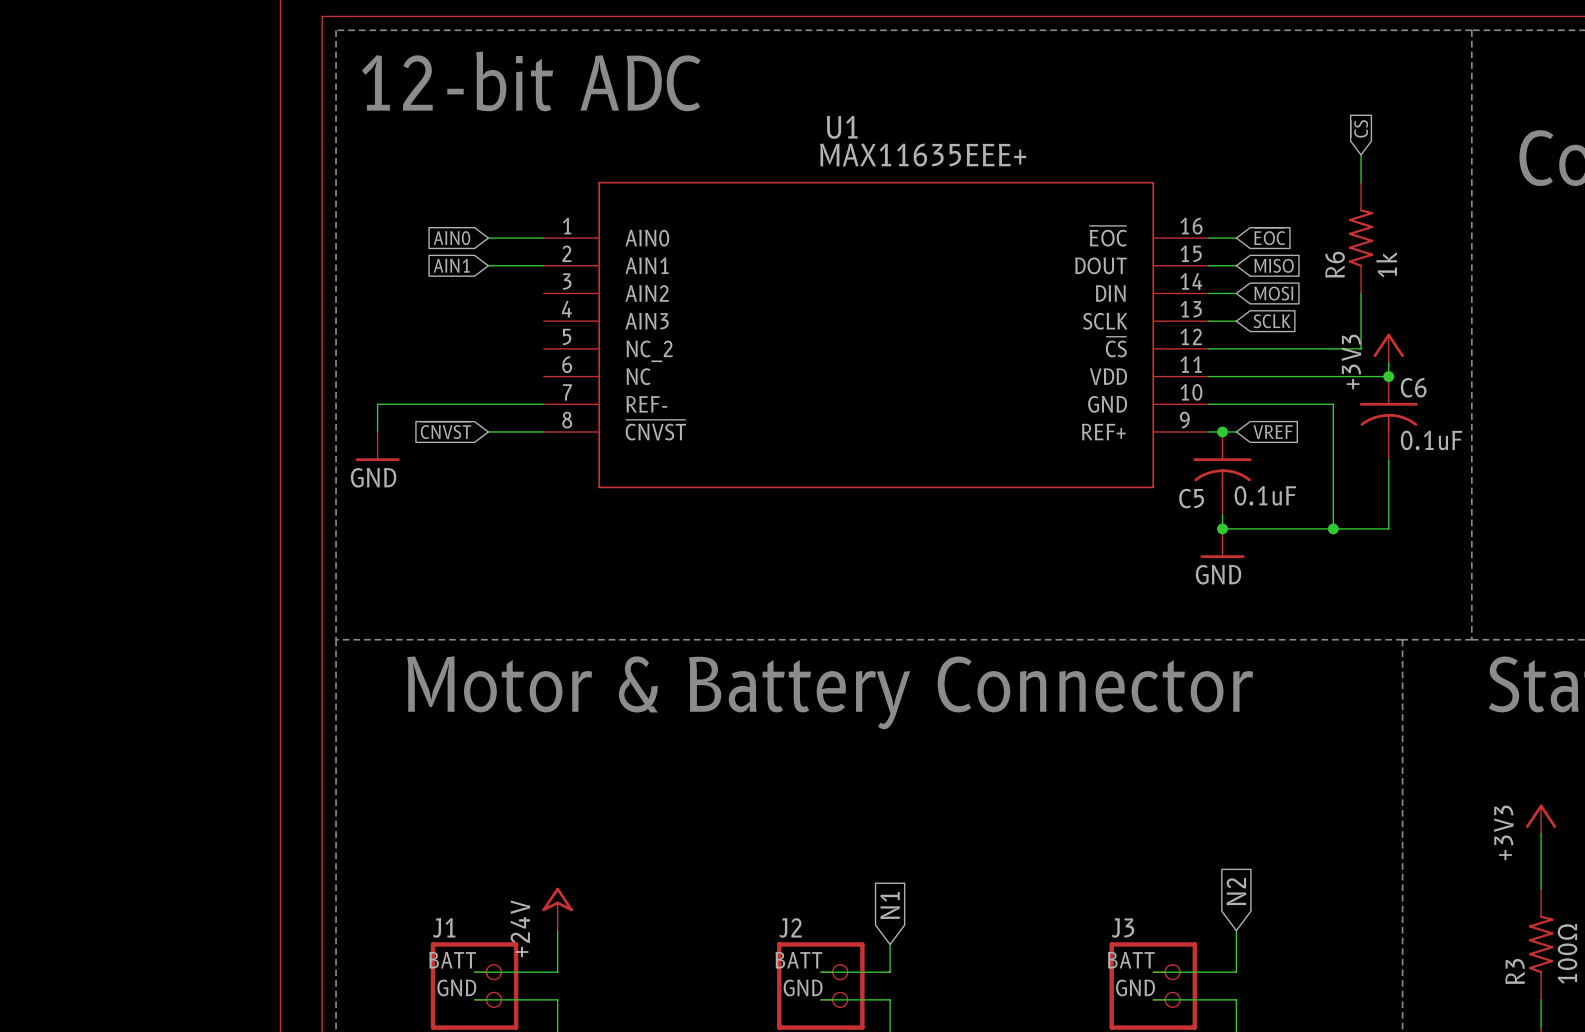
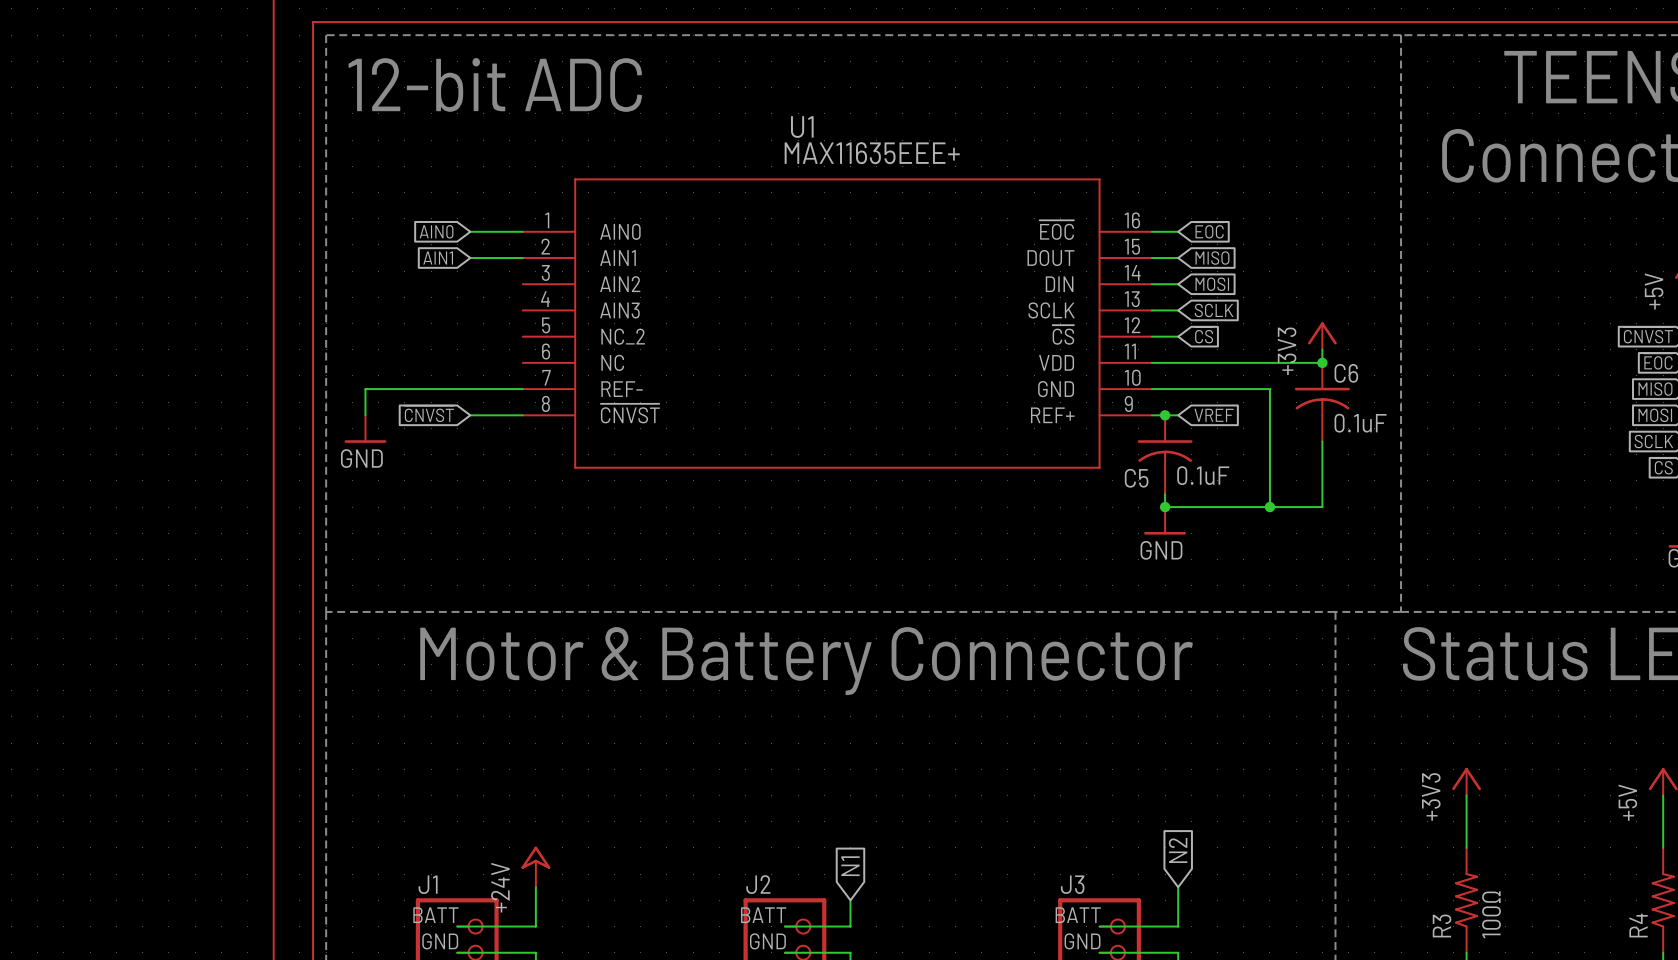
global label rotation: 0° (1359, 128) -> 90° clockwise (1204, 335)
global label position: ~{CS} (1359, 128) -> ~{CS} (1204, 335)
wire: (1361, 154) (1361, 182) -> none
R6: 1k (1361, 238) -> none
wire: (1361, 293) (1361, 348) (1236, 348) -> none

